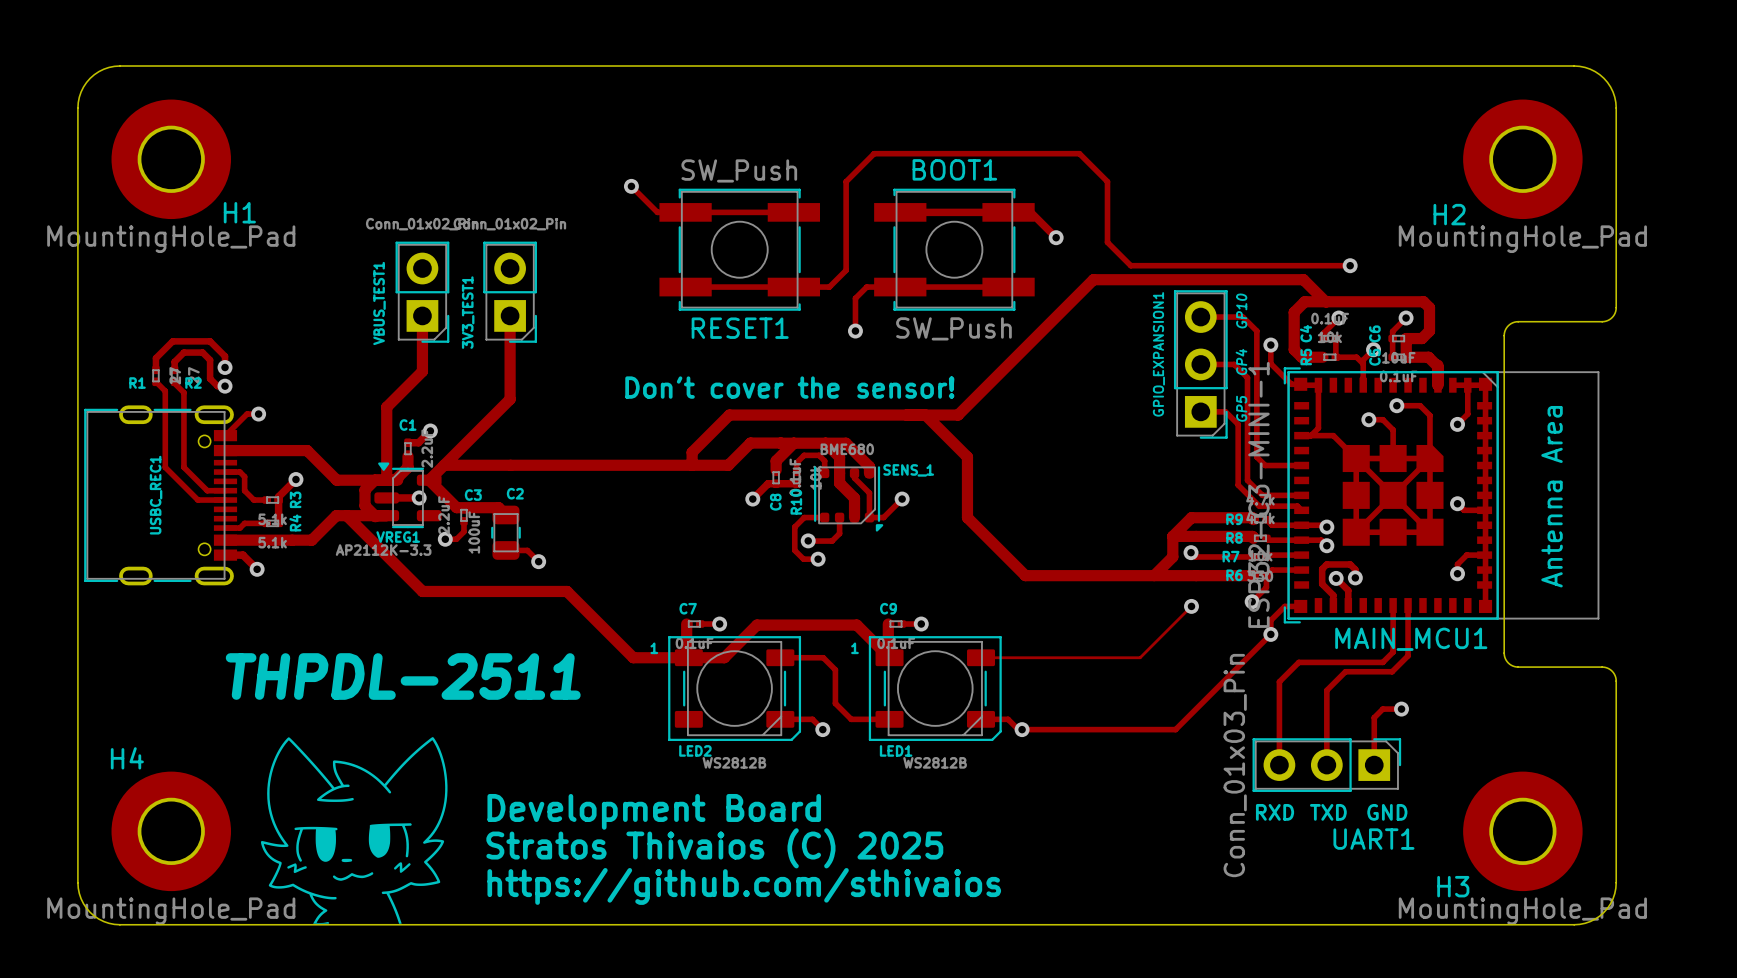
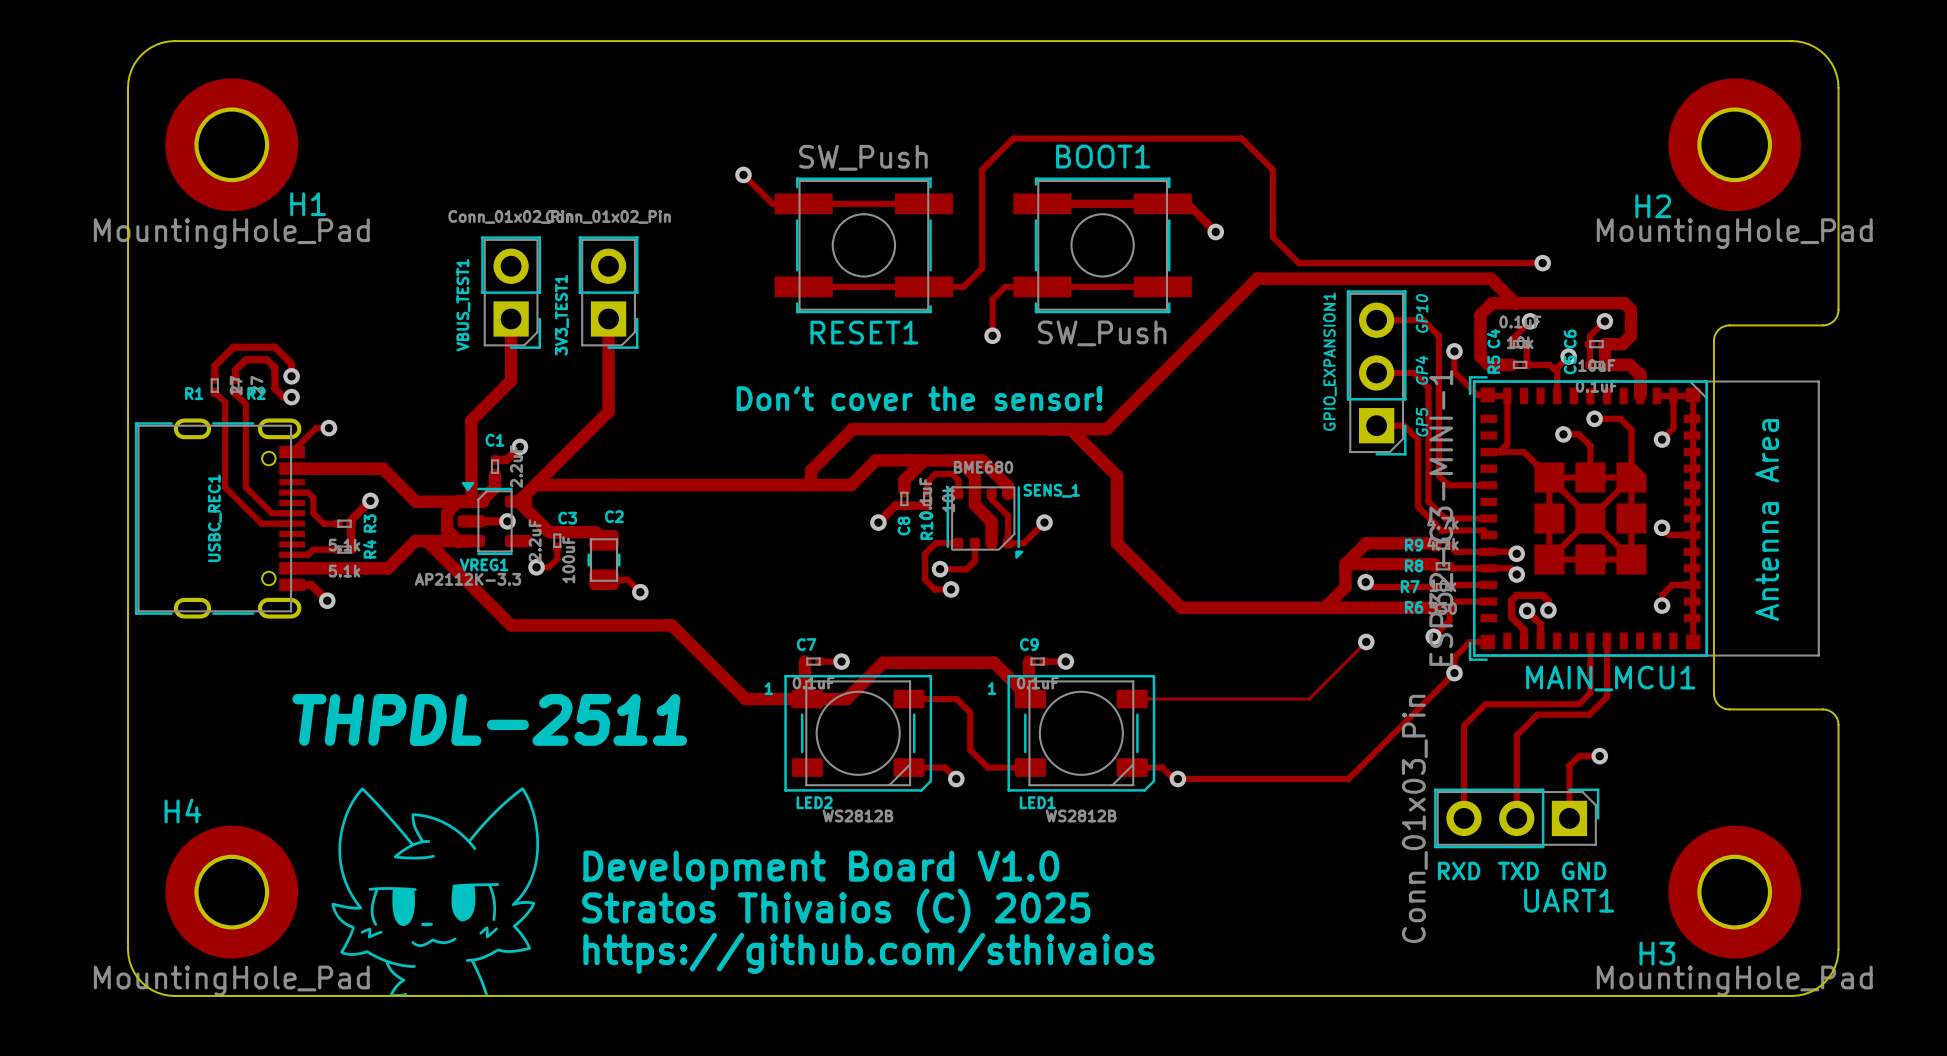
text: Development Board (654, 811) -> Development Board V1.0 (821, 870)

